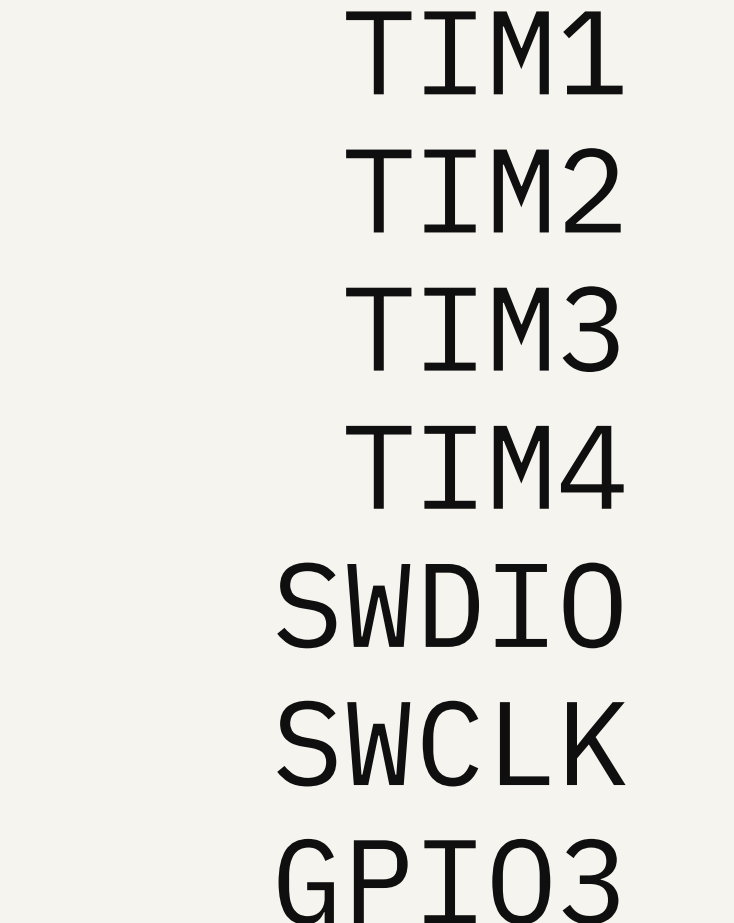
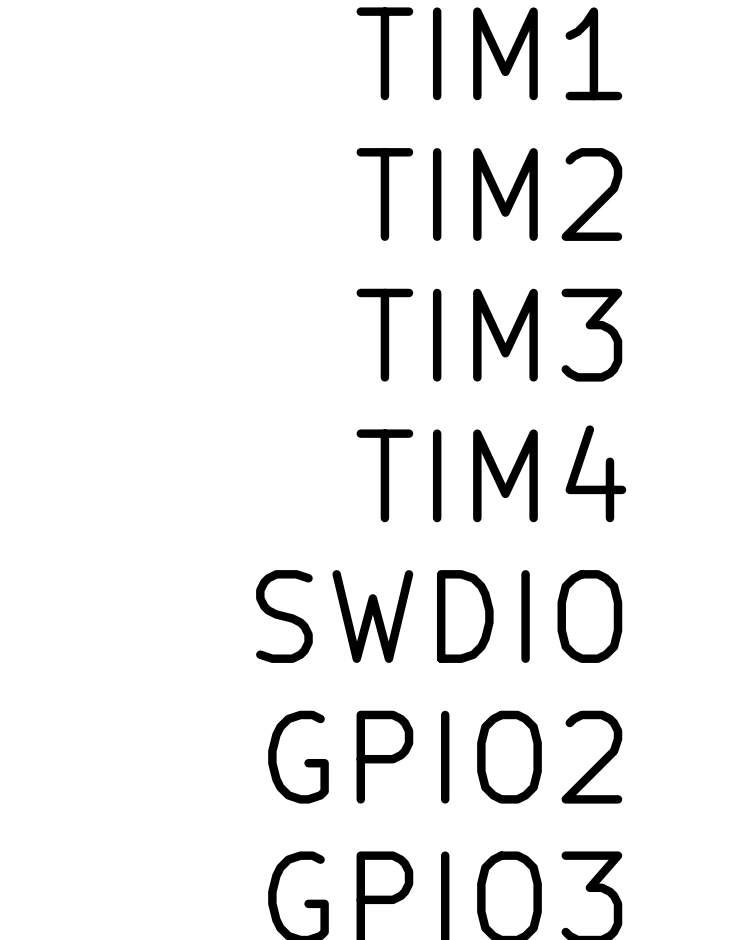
label: SWCLK (451, 743) -> GPIO2 (445, 757)

